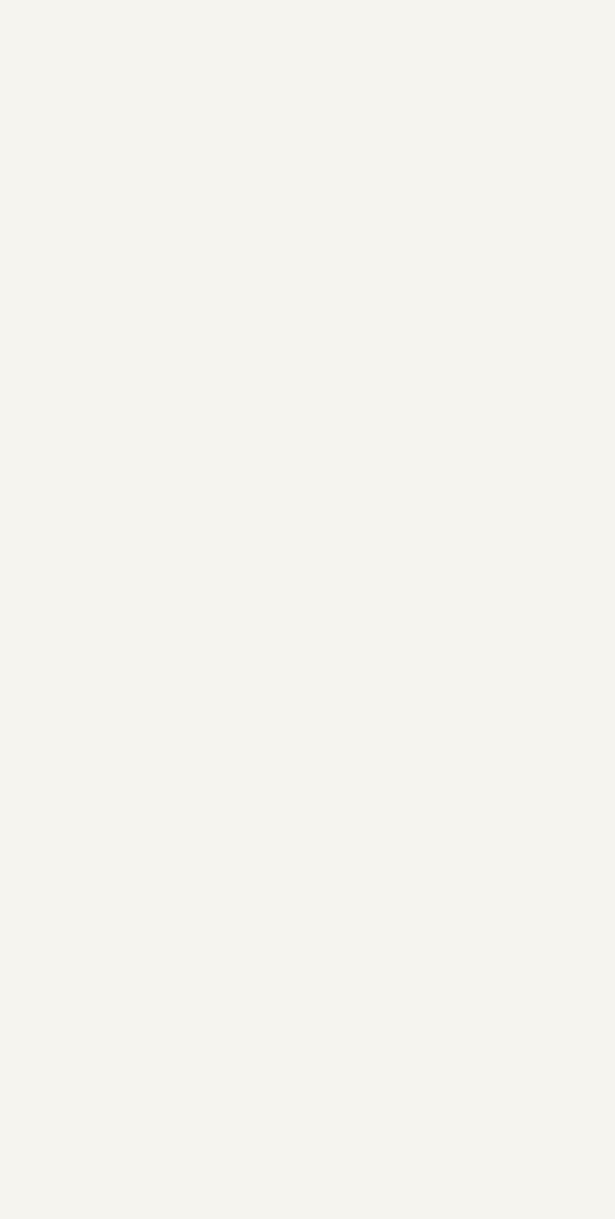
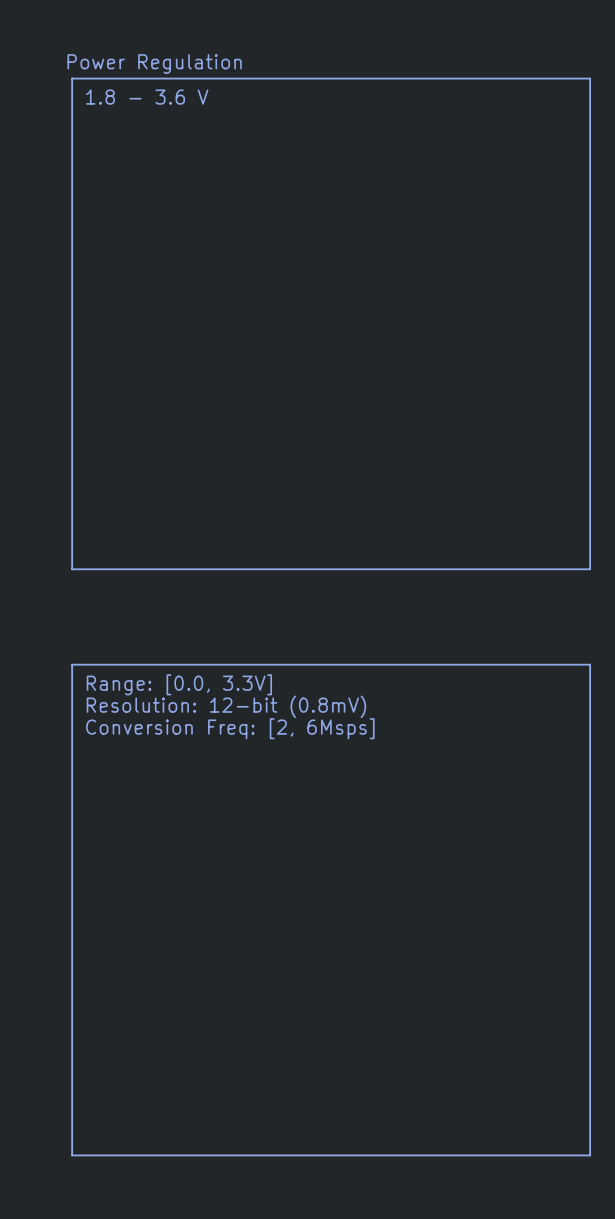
text: none -> Power Regulation (154, 64)
line: none -> (72, 78) (590, 78) (590, 569) (72, 569) (72, 78)
text: none -> 1.8 - 3.6 V (147, 97)
line: none -> (72, 664) (72, 1155) (590, 1155) (590, 664) (72, 664)
text: none -> Range: [0.0, 3.3V] (179, 684)
text: none -> Resolution: 12-bit (0.8mV) (226, 706)
text: none -> Conversion Freq: [2, 6Msps] (230, 728)

